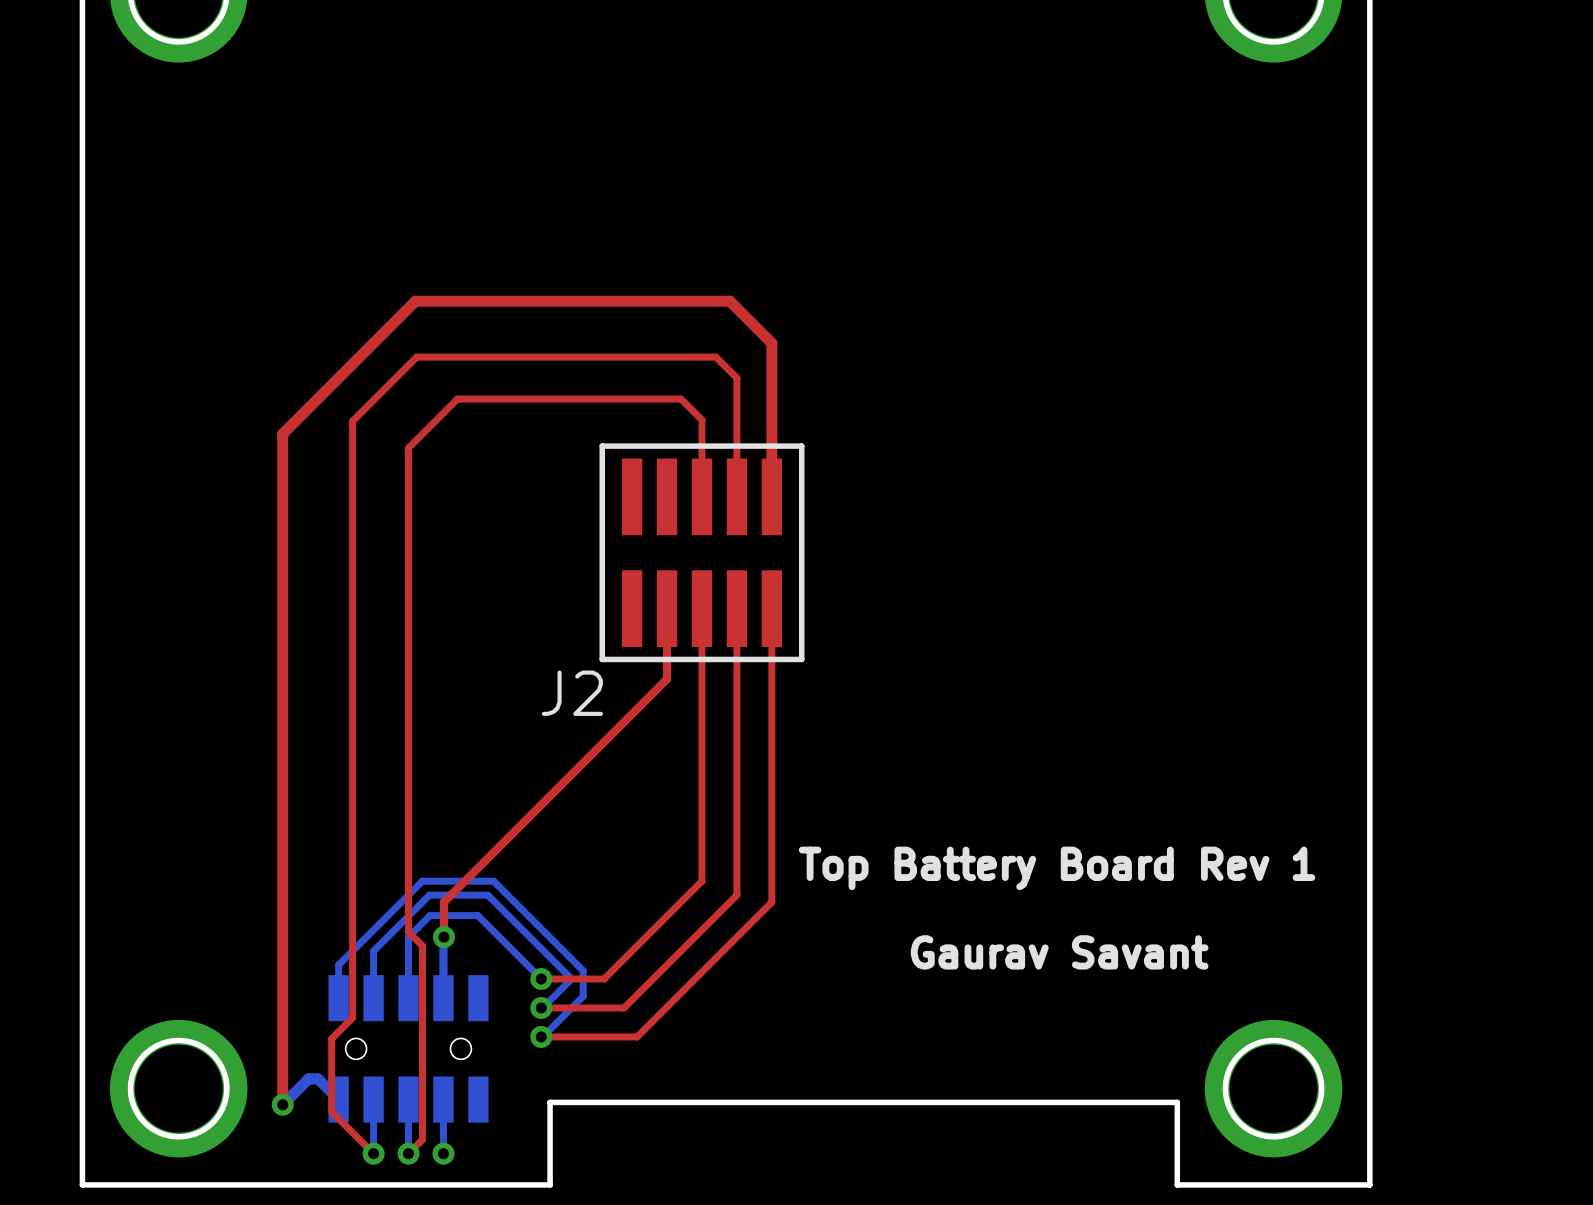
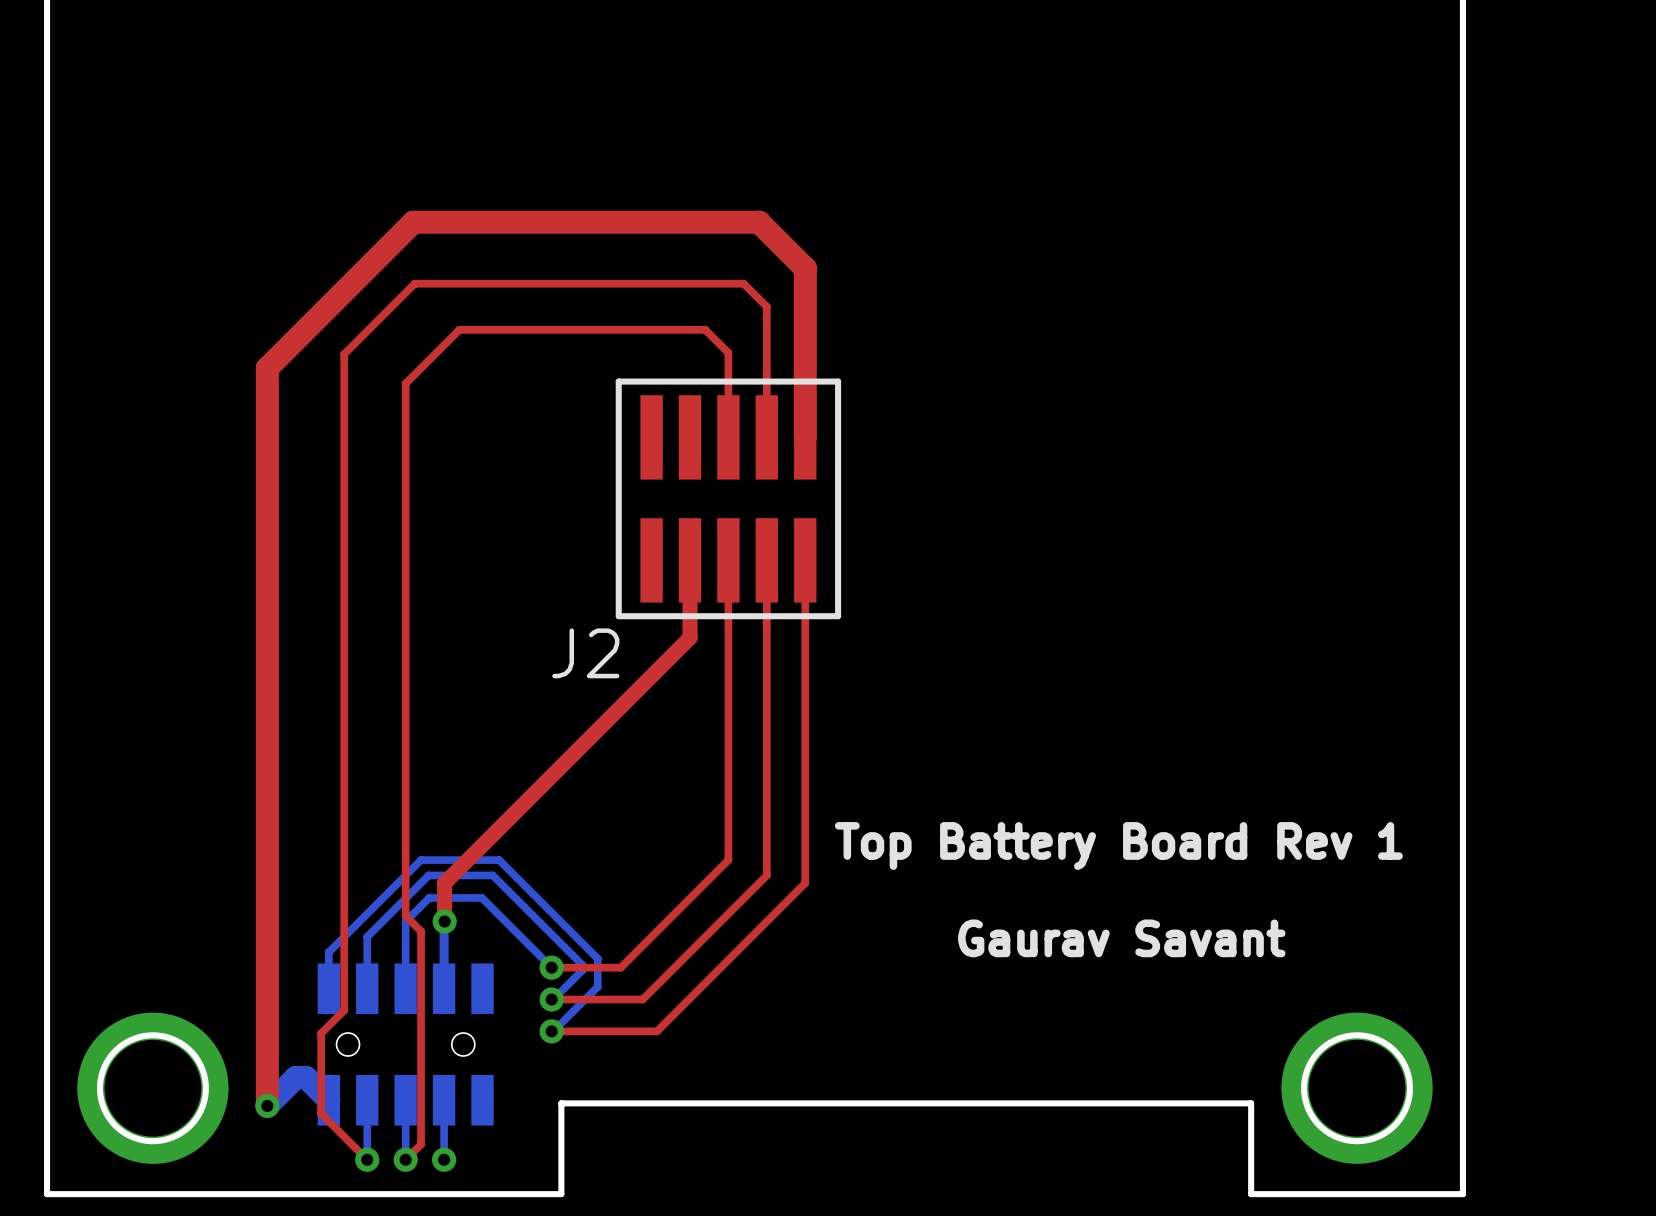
top track width: thin (771, 496) (771, 343) (729, 301) (415, 301) (282, 433) (282, 1104) -> thick (805, 437) (805, 268) (759, 222) (413, 222) (267, 368) (267, 1105)
top track width: thin (667, 608) (667, 679) (443, 902) (443, 937) -> thick (690, 560) (690, 637) (444, 883) (444, 921)
bottom track width: thin (338, 1099) (318, 1078) (308, 1078) (282, 1104) -> thick (328, 1100) (306, 1077) (295, 1077) (267, 1105)

